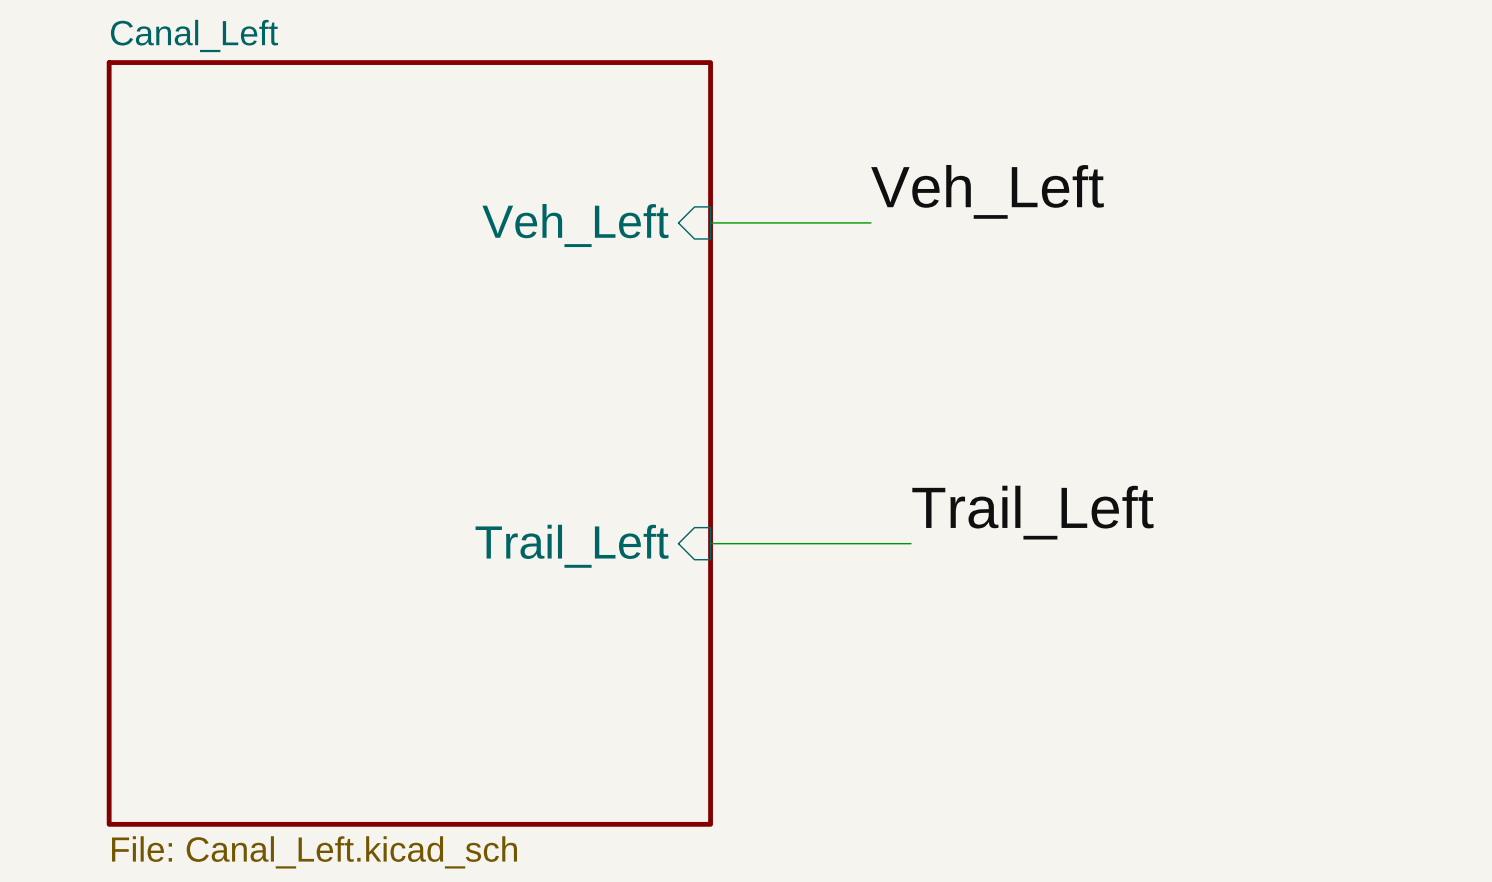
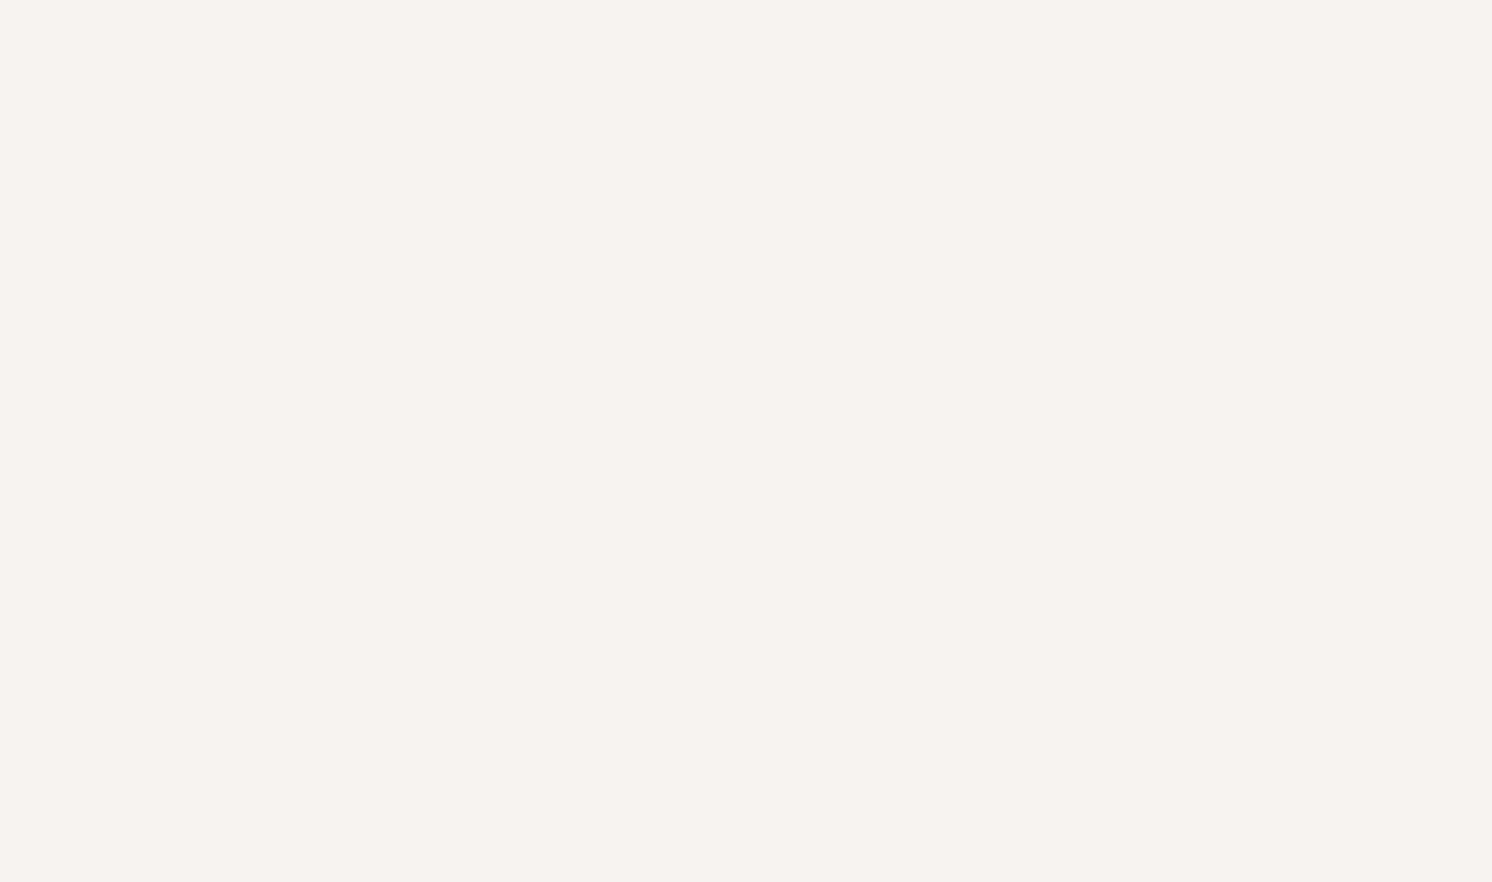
label: Veh_Left (987, 191) -> none
wire: (710, 222) (870, 222) -> none
sheet pin: Veh_Left (575, 225) -> none
sheet Canal_Left: File: Canal_Left.kicad_sch (409, 443) -> none
label: Trail_Left (1032, 512) -> none
wire: (710, 543) (911, 543) -> none
sheet pin: Trail_Left (572, 546) -> none

